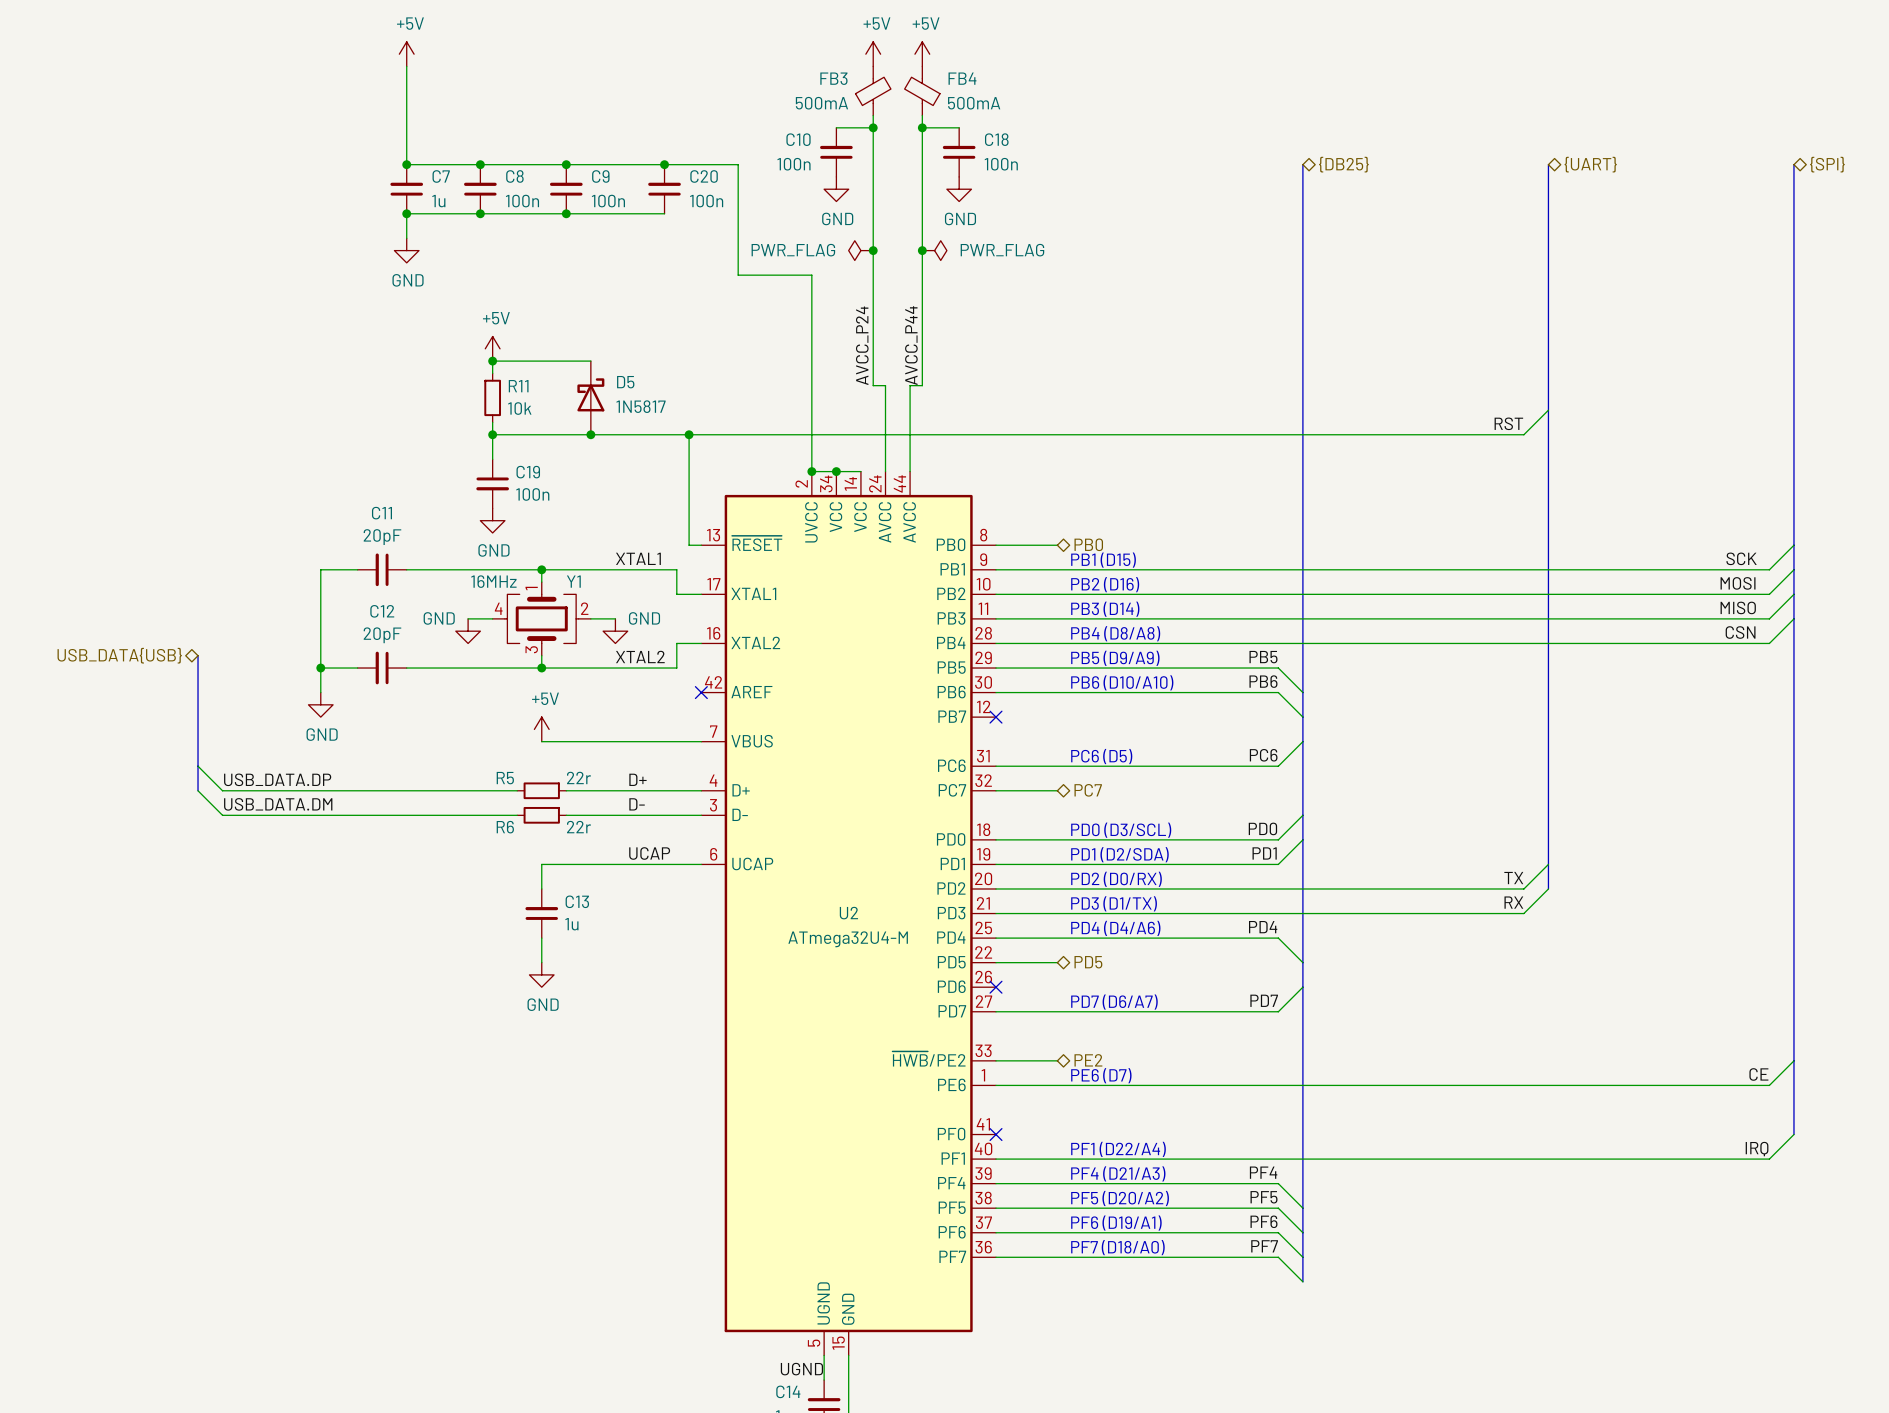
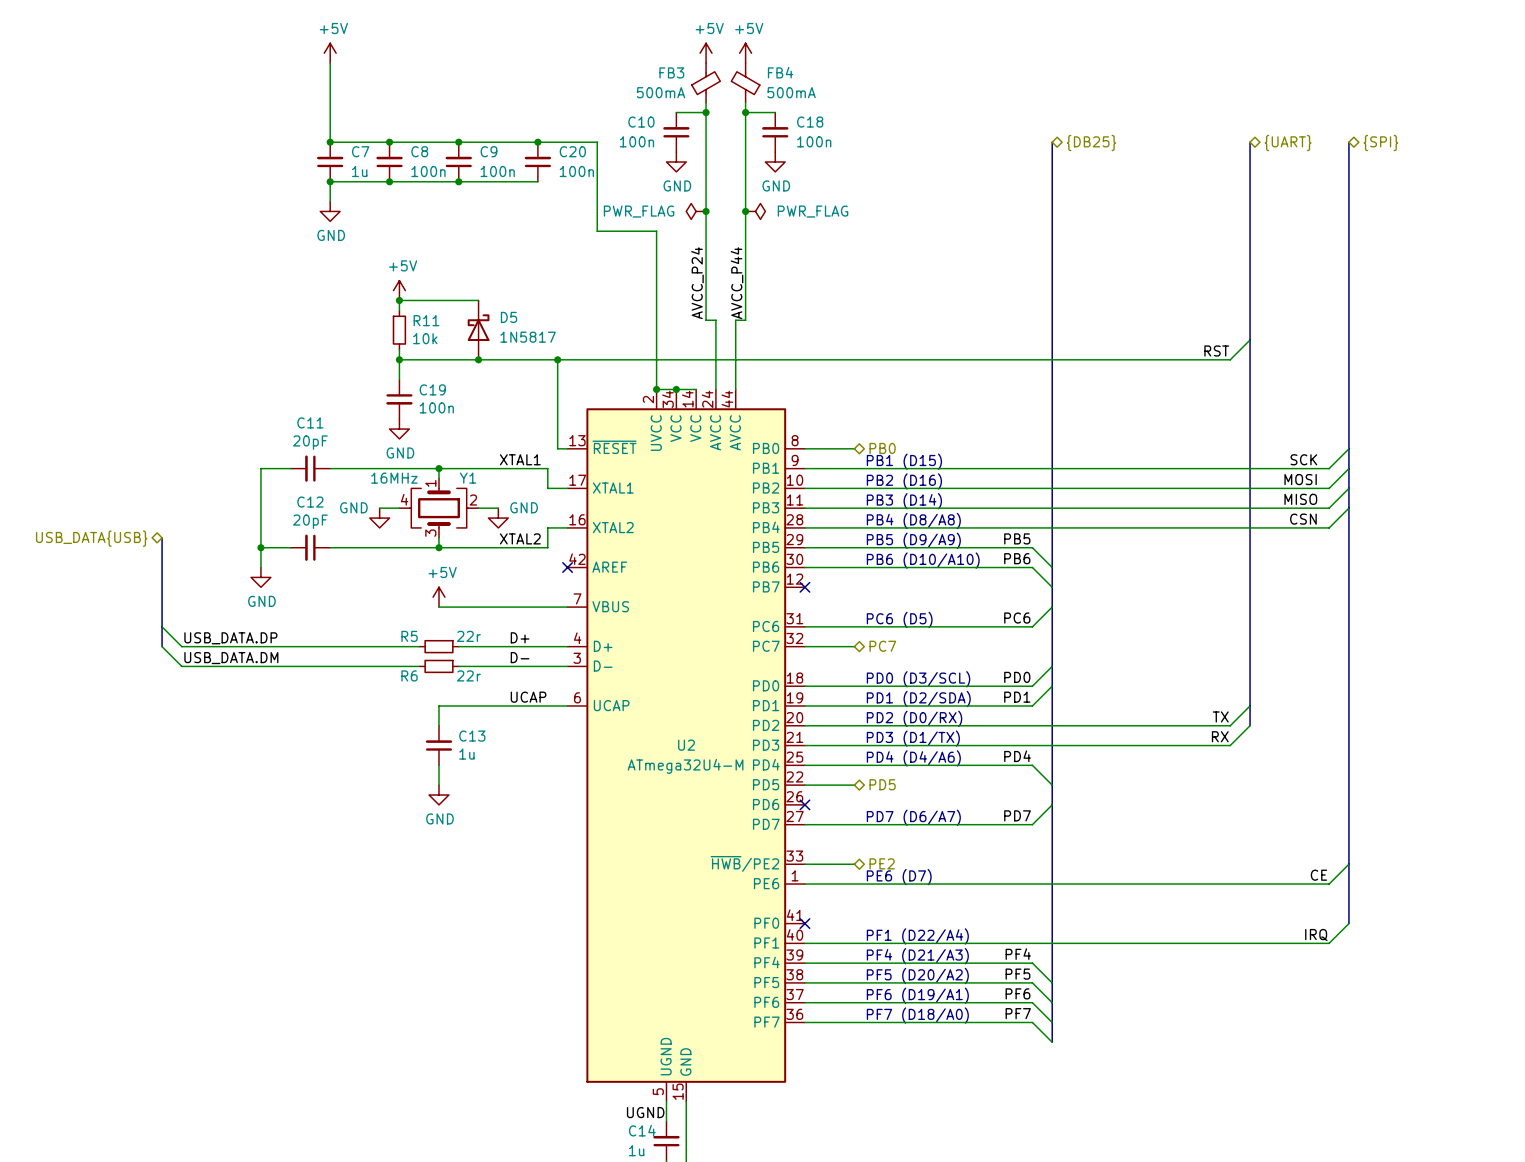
bus: (1793, 164) (1793, 1134) -> (1348, 142) (1348, 923)
hierarchical label position: {SPI} (1827, 164) -> {SPI} (1380, 143)
wire: (1793, 545) (1769, 569) (1646, 569) -> (1348, 448) (1329, 468)
label position: SCK (1741, 558) -> SCK (1303, 459)
wire: (1793, 569) (1769, 594) (1646, 594) -> (1348, 468) (1329, 488)
label position: MOSI (1738, 583) -> MOSI (1300, 479)
wire: (1793, 594) (1769, 618) (1646, 618) -> (1348, 488) (1329, 508)
label position: MISO (1738, 607) -> MISO (1300, 499)
wire: (1793, 618) (1769, 643) (1646, 643) -> (1348, 508) (1329, 527)
label position: CSN (1740, 632) -> CSN (1303, 519)
wire: (1793, 1060) (1769, 1085) (1646, 1085) -> (1348, 864) (1329, 884)
label position: CE (1758, 1074) -> CE (1318, 875)
wire: (1793, 1134) (1769, 1159) (1646, 1159) -> (1348, 923) (1329, 943)
label position: IRQ (1757, 1149) -> IRQ (1316, 935)

